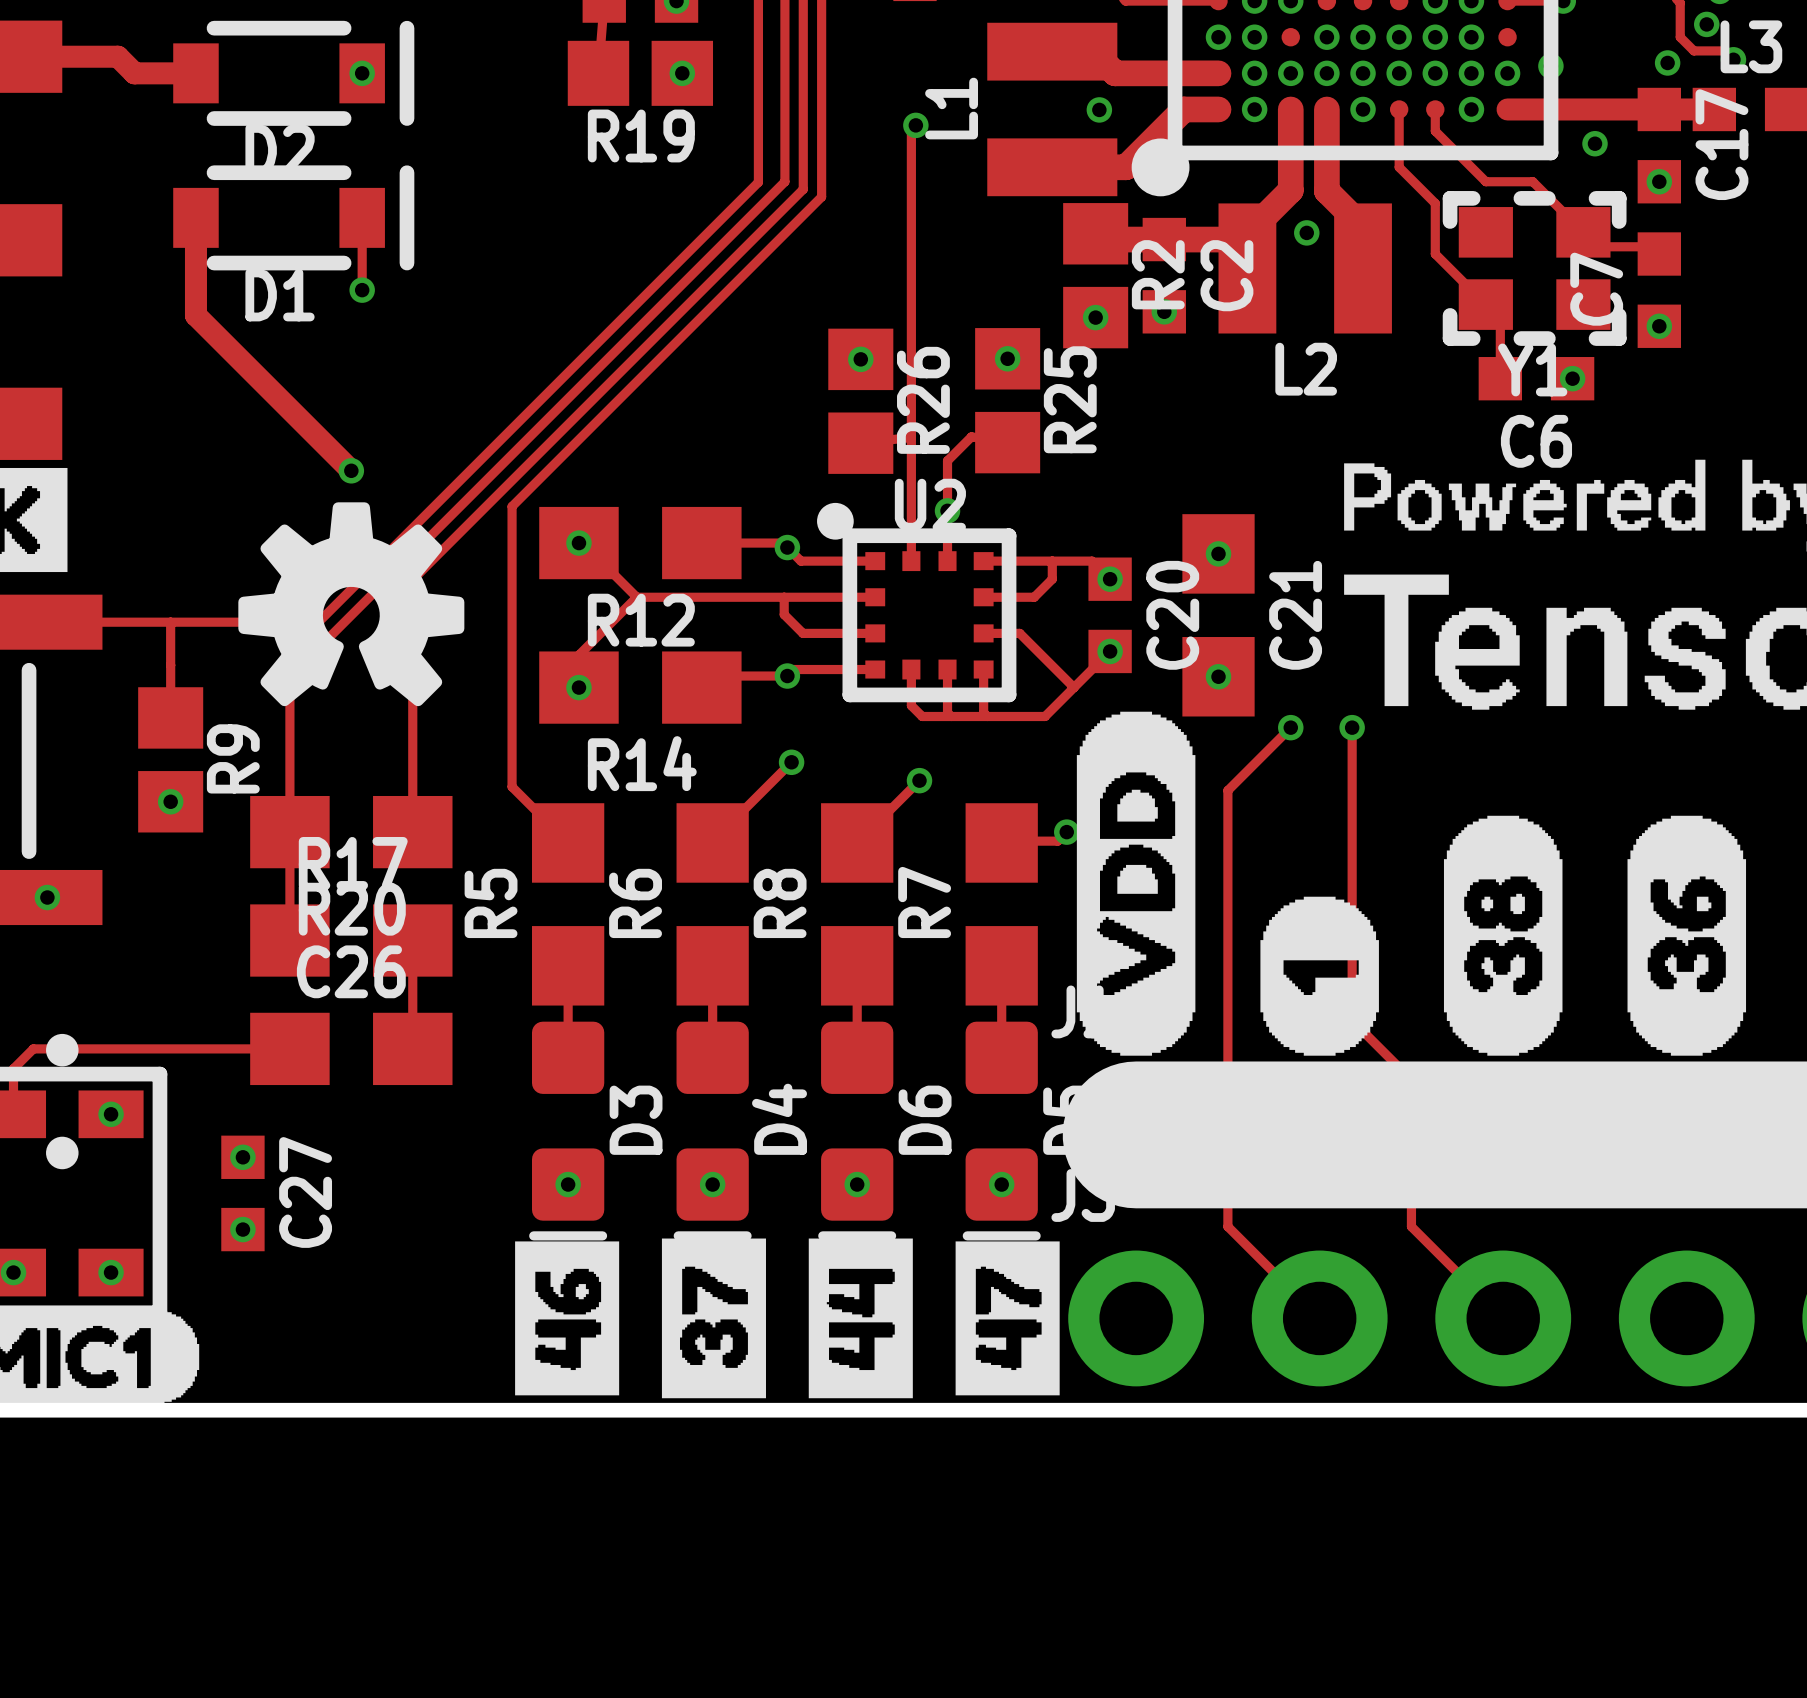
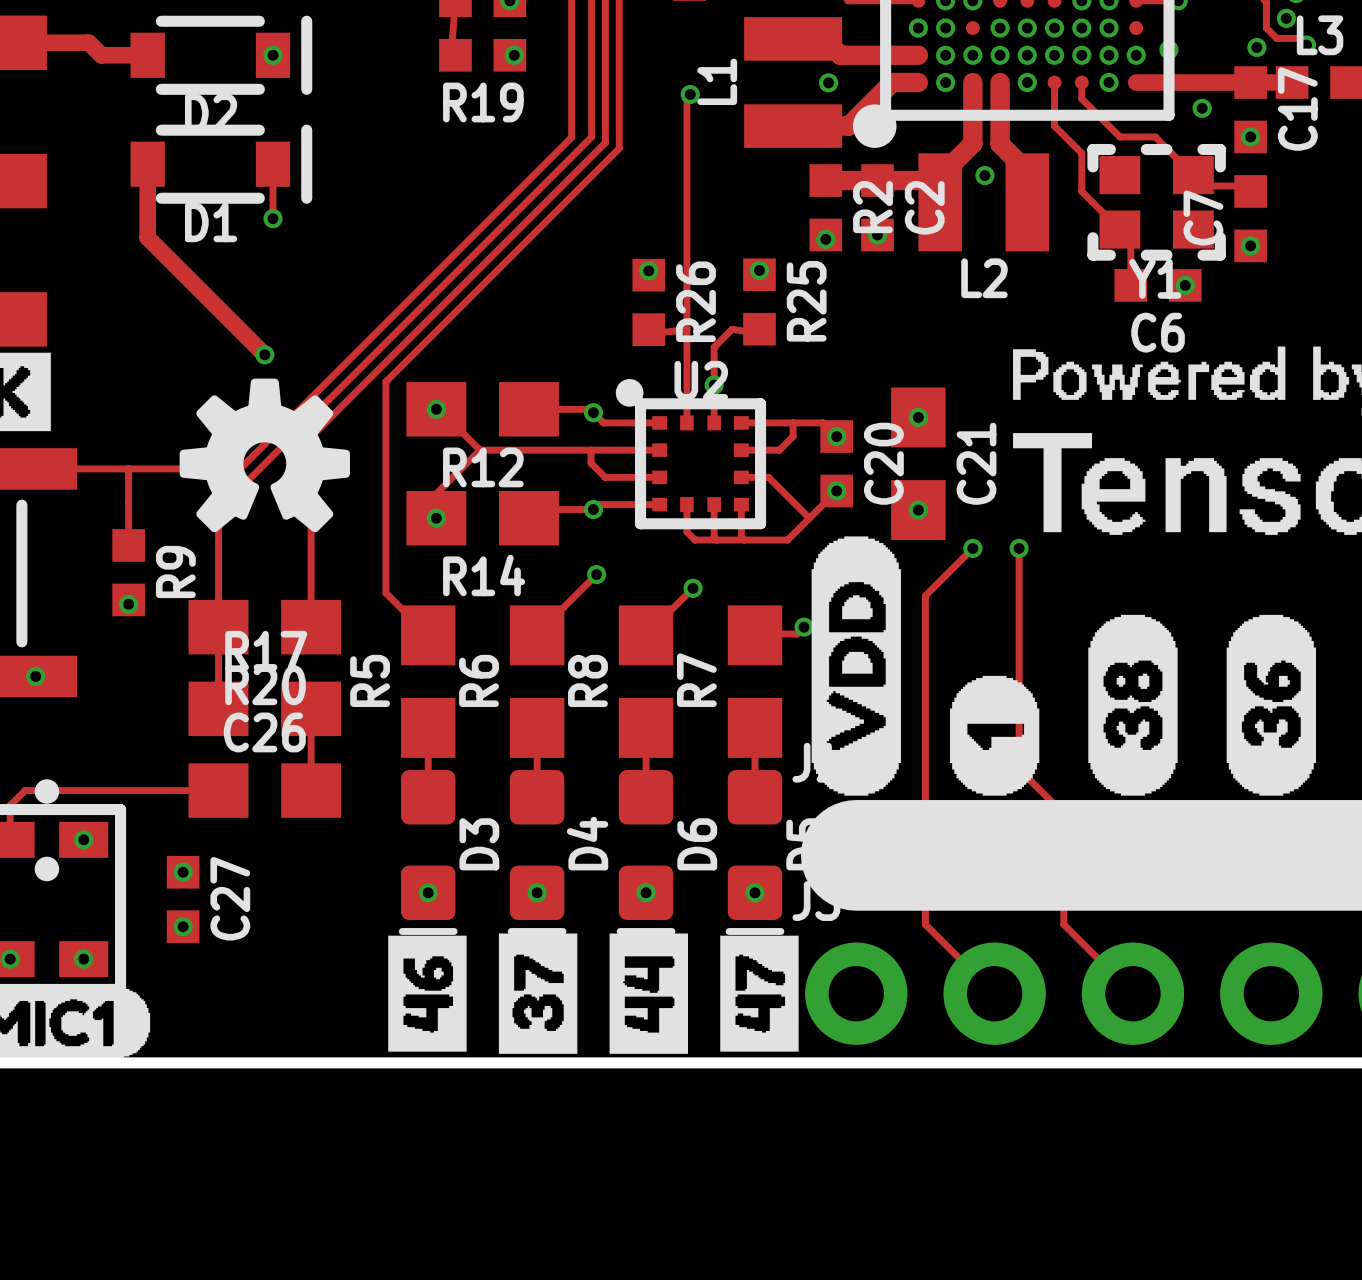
R19 footprint: [567, 40, 714, 106] -> [439, 38, 527, 72]
R2 footprint: [1063, 203, 1129, 349] -> [809, 164, 843, 252]
R26 footprint: [828, 328, 894, 474] -> [632, 258, 666, 347]
R25 footprint: [975, 328, 1041, 474] -> [743, 258, 776, 346]
R9 footprint: [138, 687, 204, 833] -> [112, 529, 145, 617]

